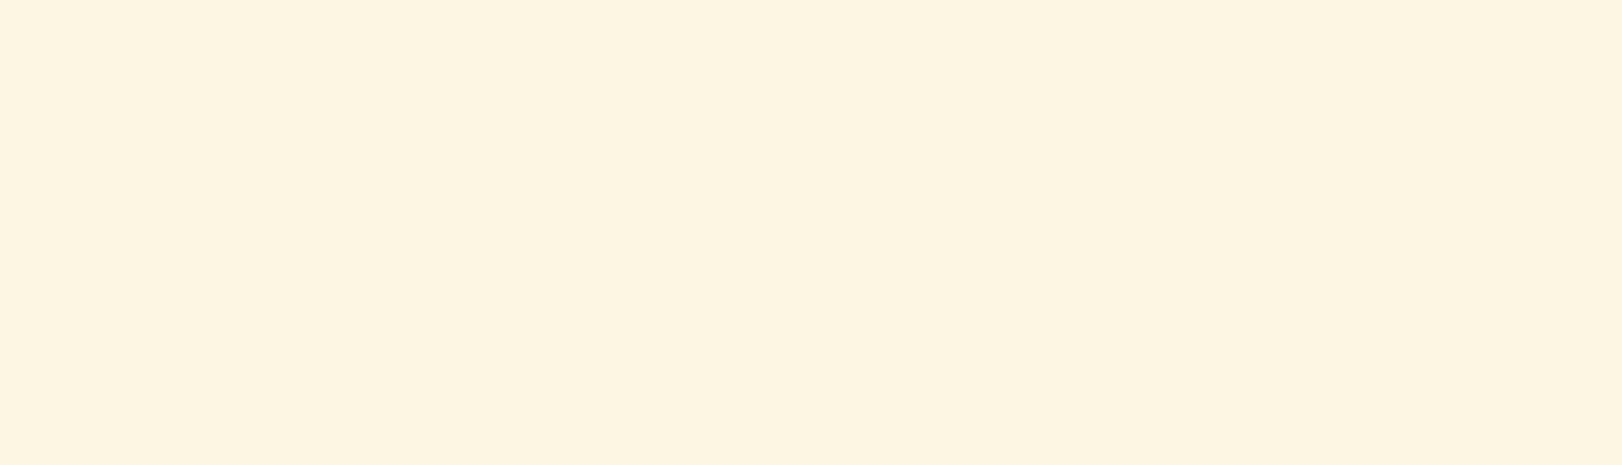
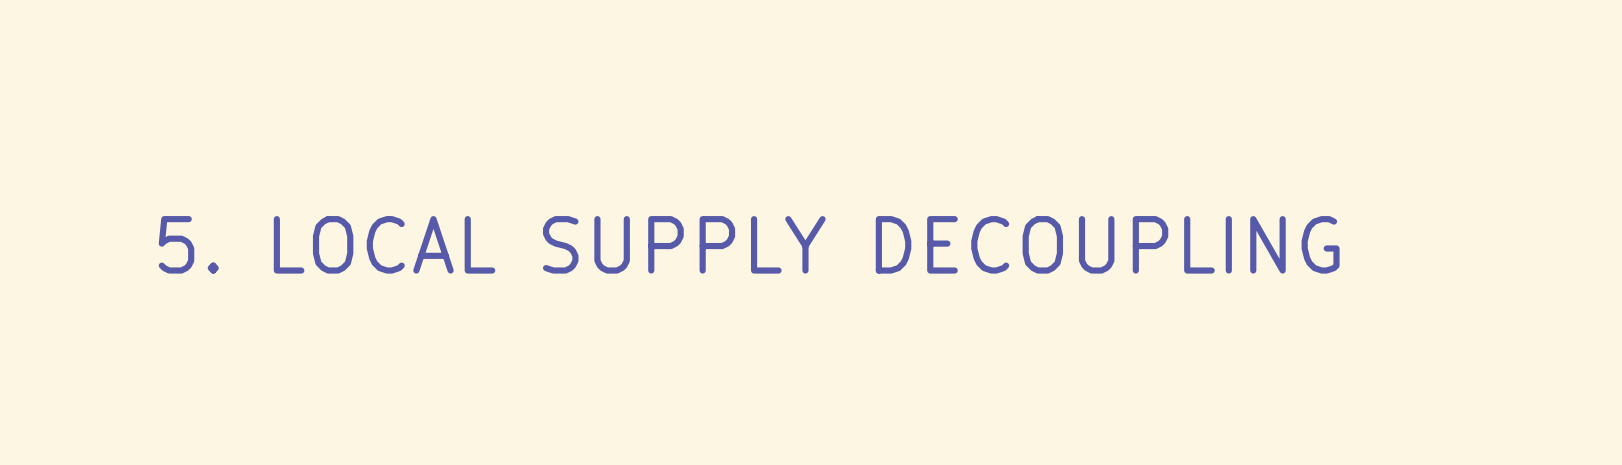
text: none -> 5. LOCAL SUPPLY DECOUPLING (749, 244)

